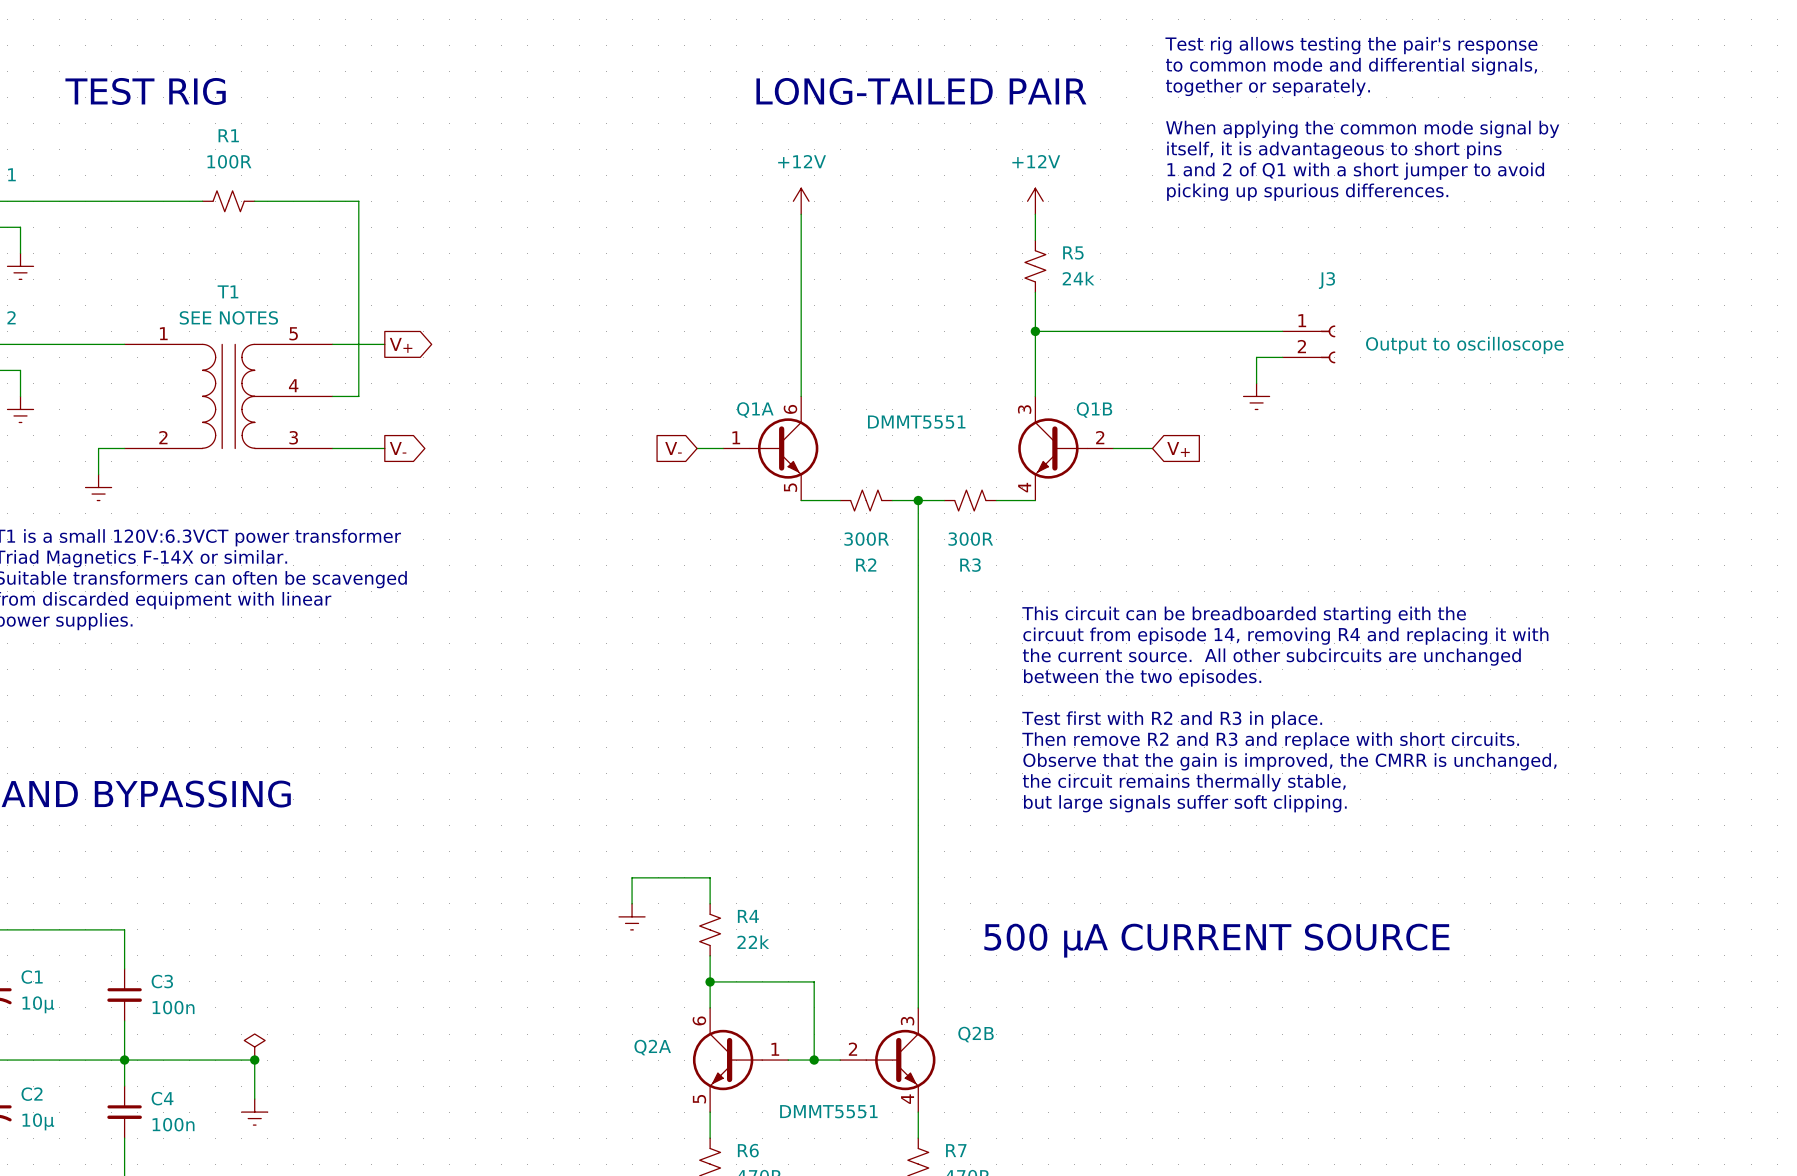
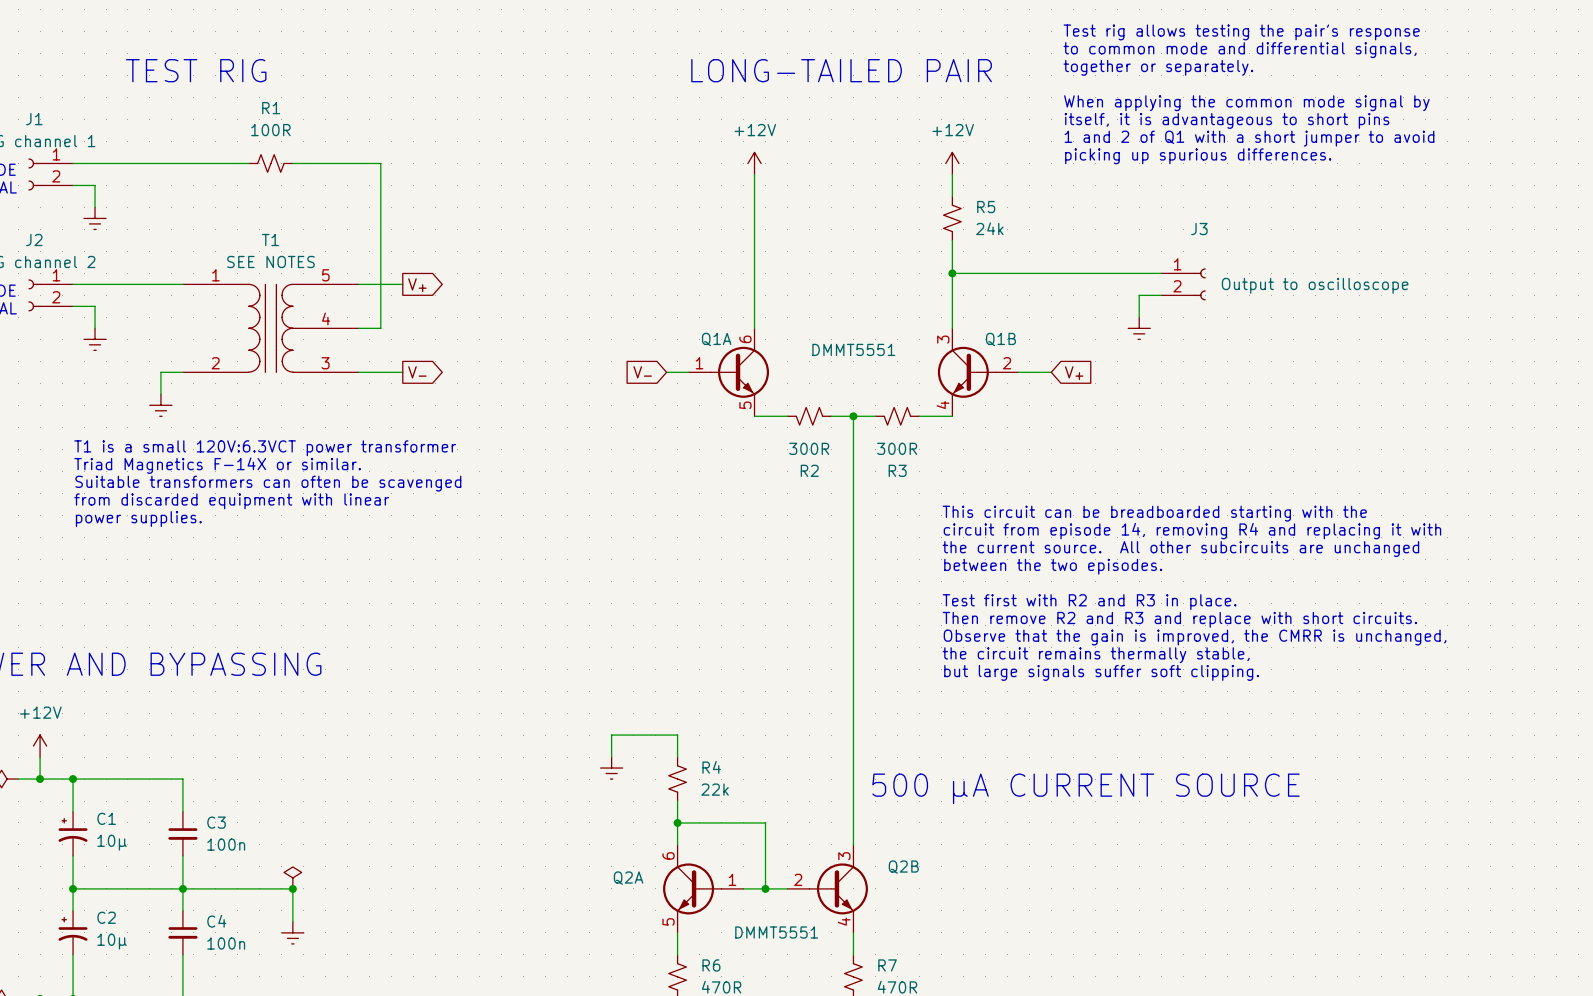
text: This circuit can be breadboarded starting eith the (1244, 615) -> This circuit can be breadboarded starting with the (1154, 513)
text: circuut from episode 14, removing R4 and replacing it with (1285, 636) -> circuit from episode 14, removing R4 and replacing it with (1192, 531)

